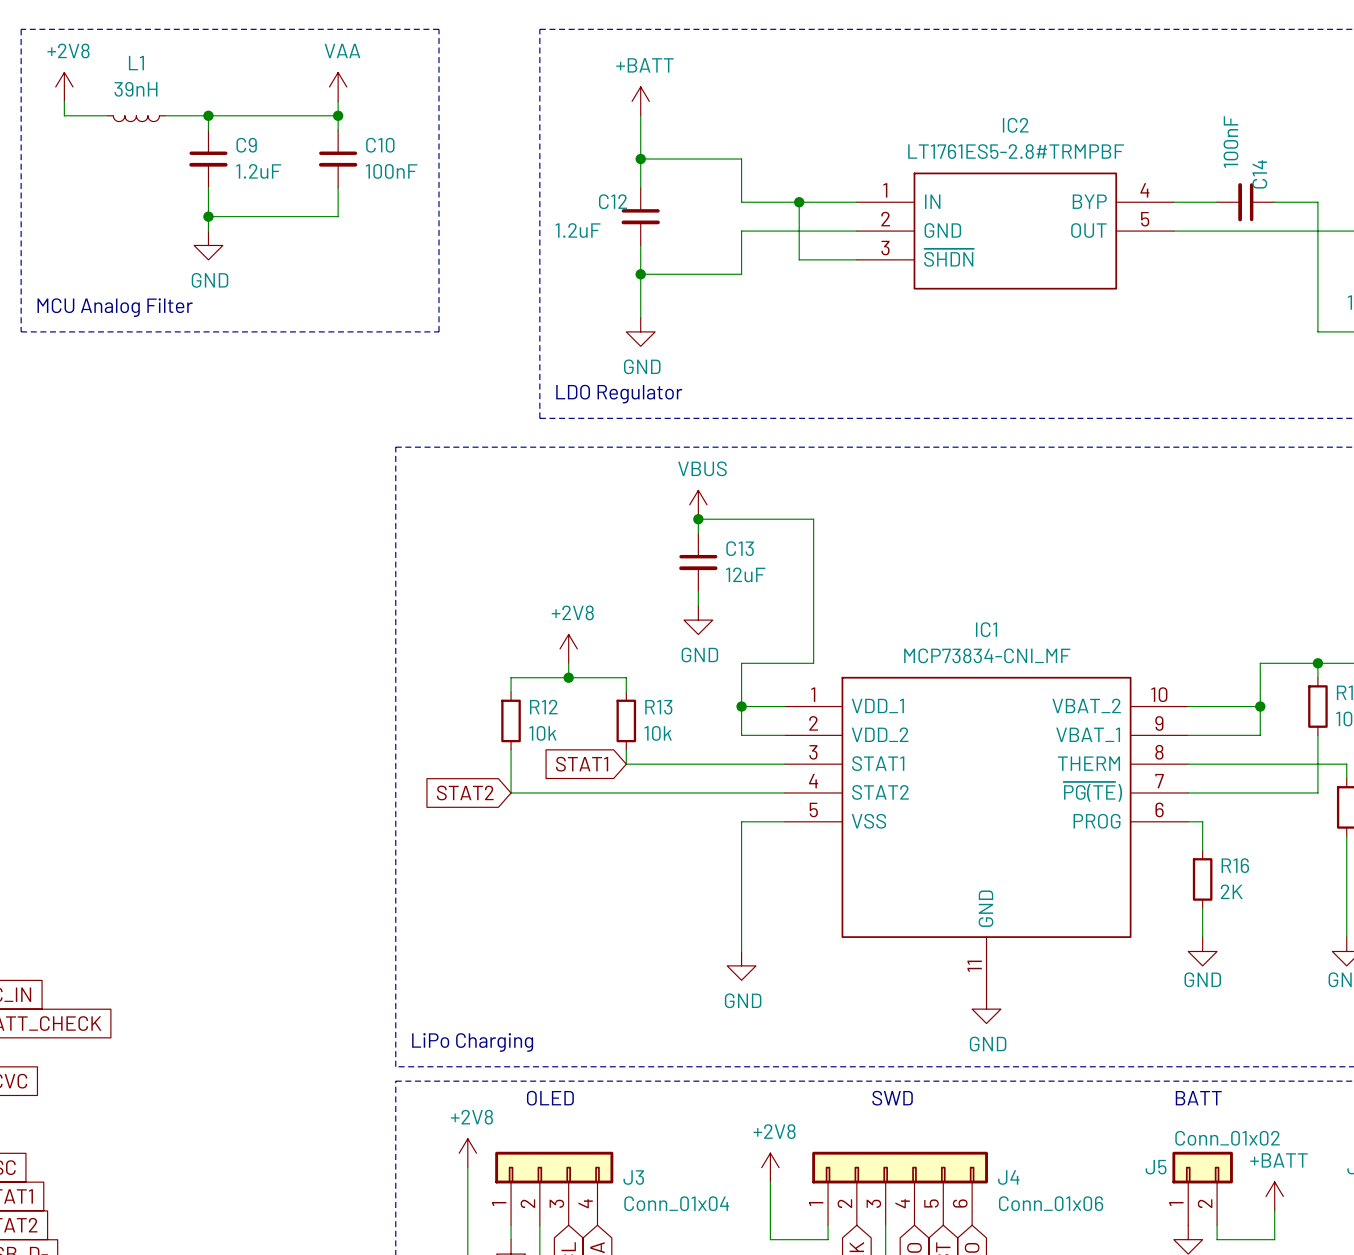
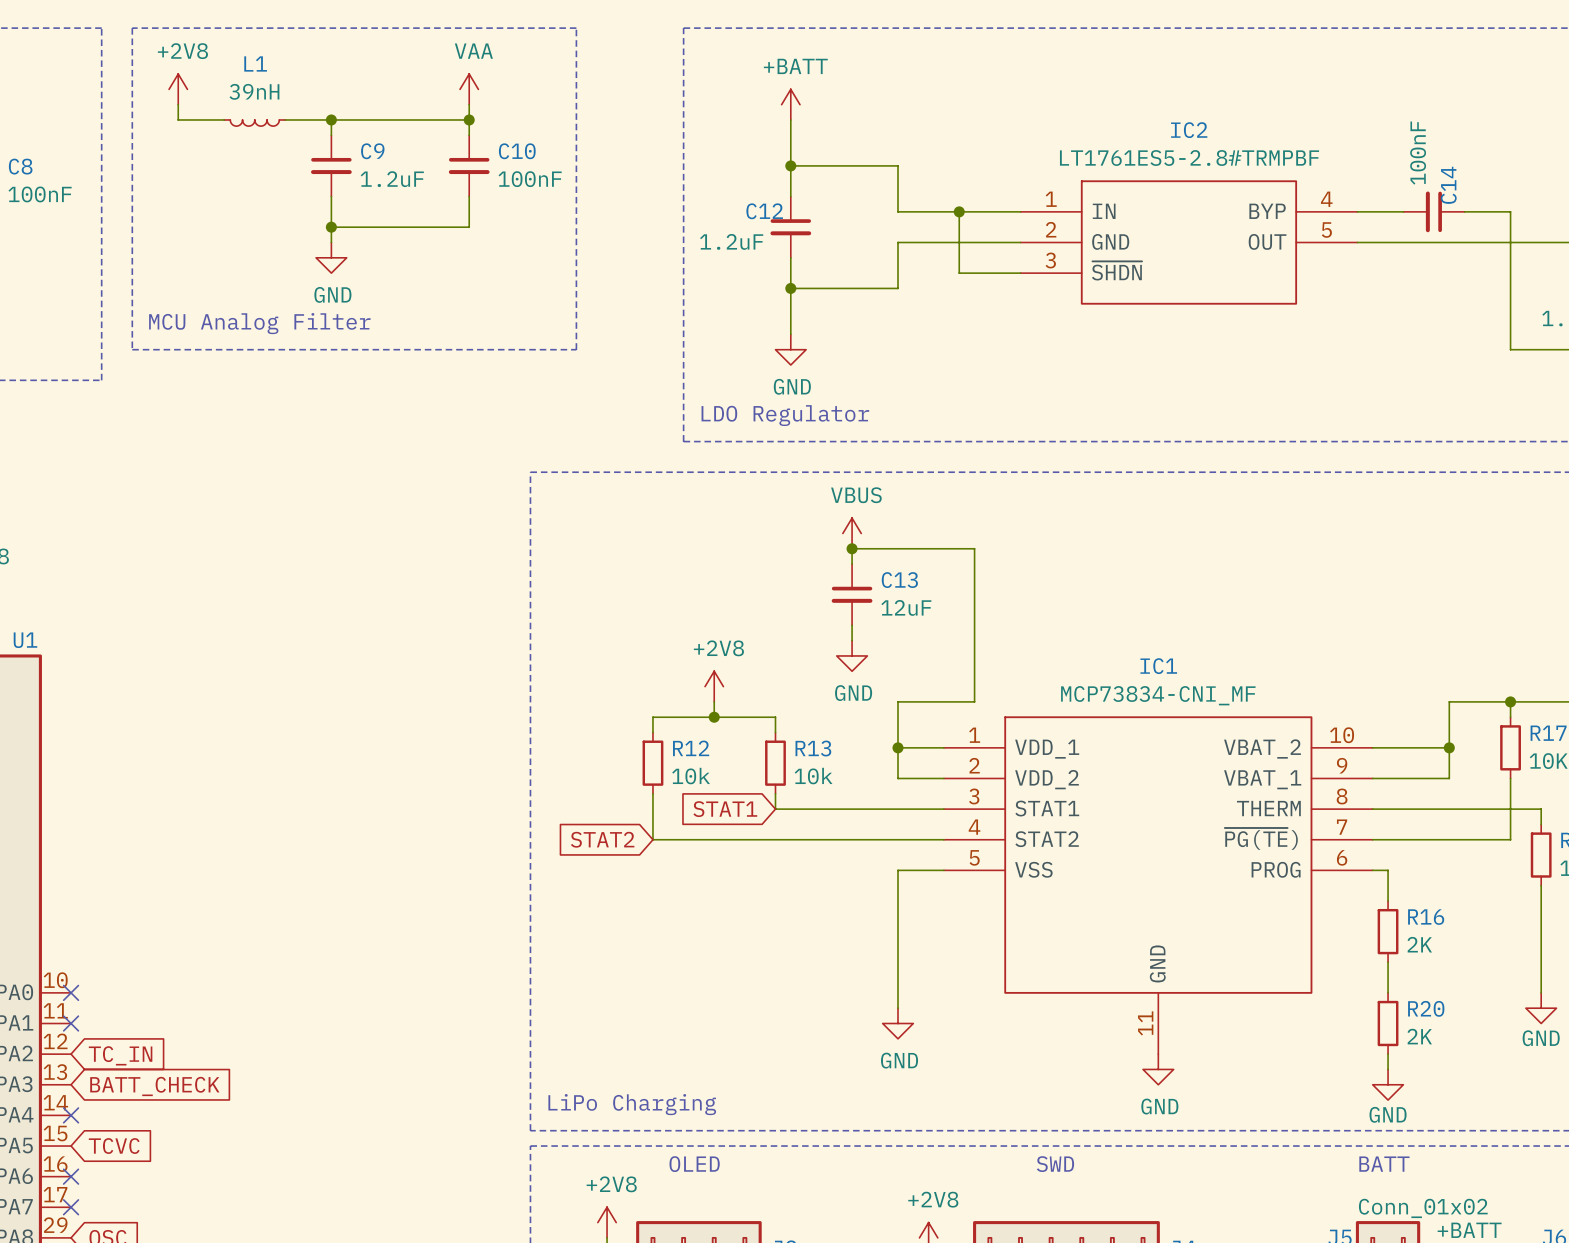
power symbol position: GND (1202, 951) -> GND (1388, 1084)
R20: none -> 2K (1388, 1023)
wire: none -> (1388, 1054) (1388, 1069)

